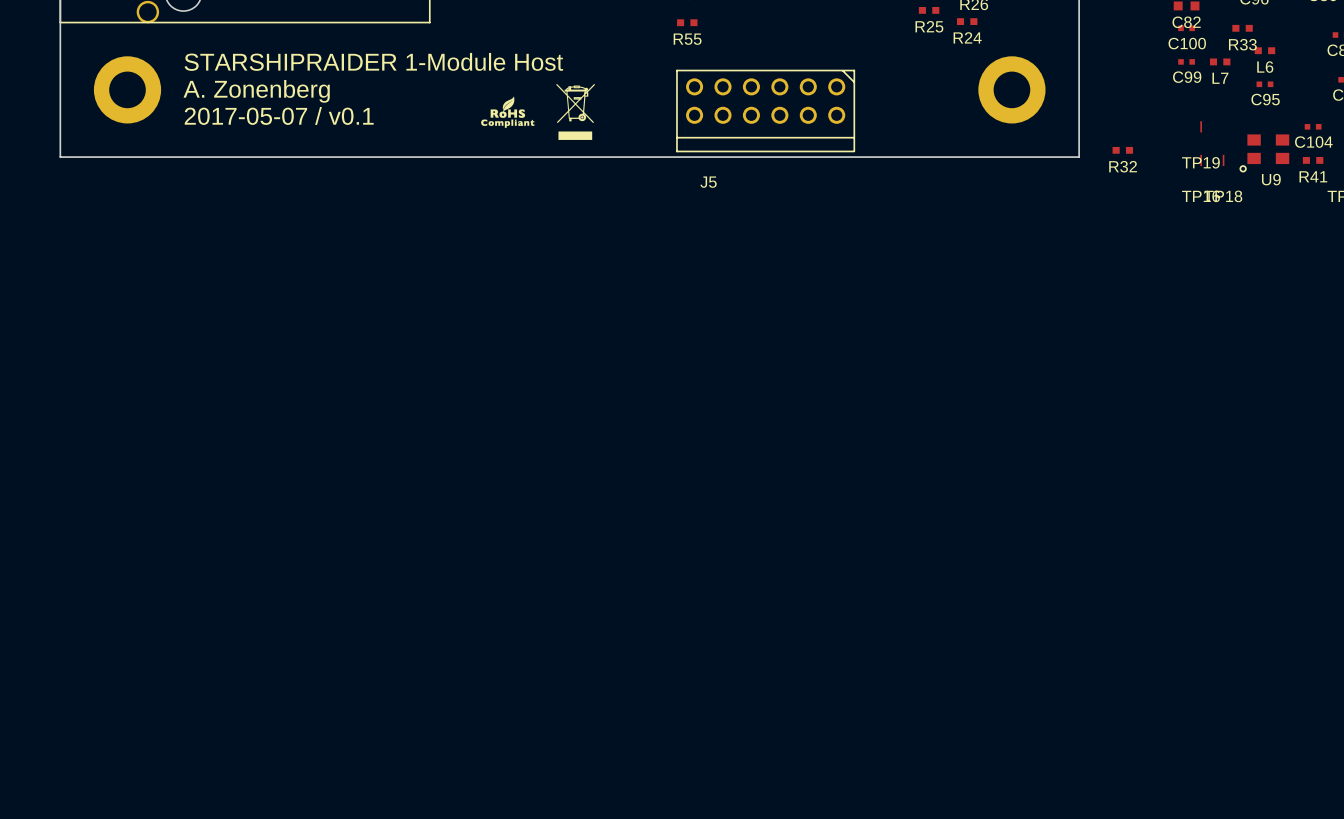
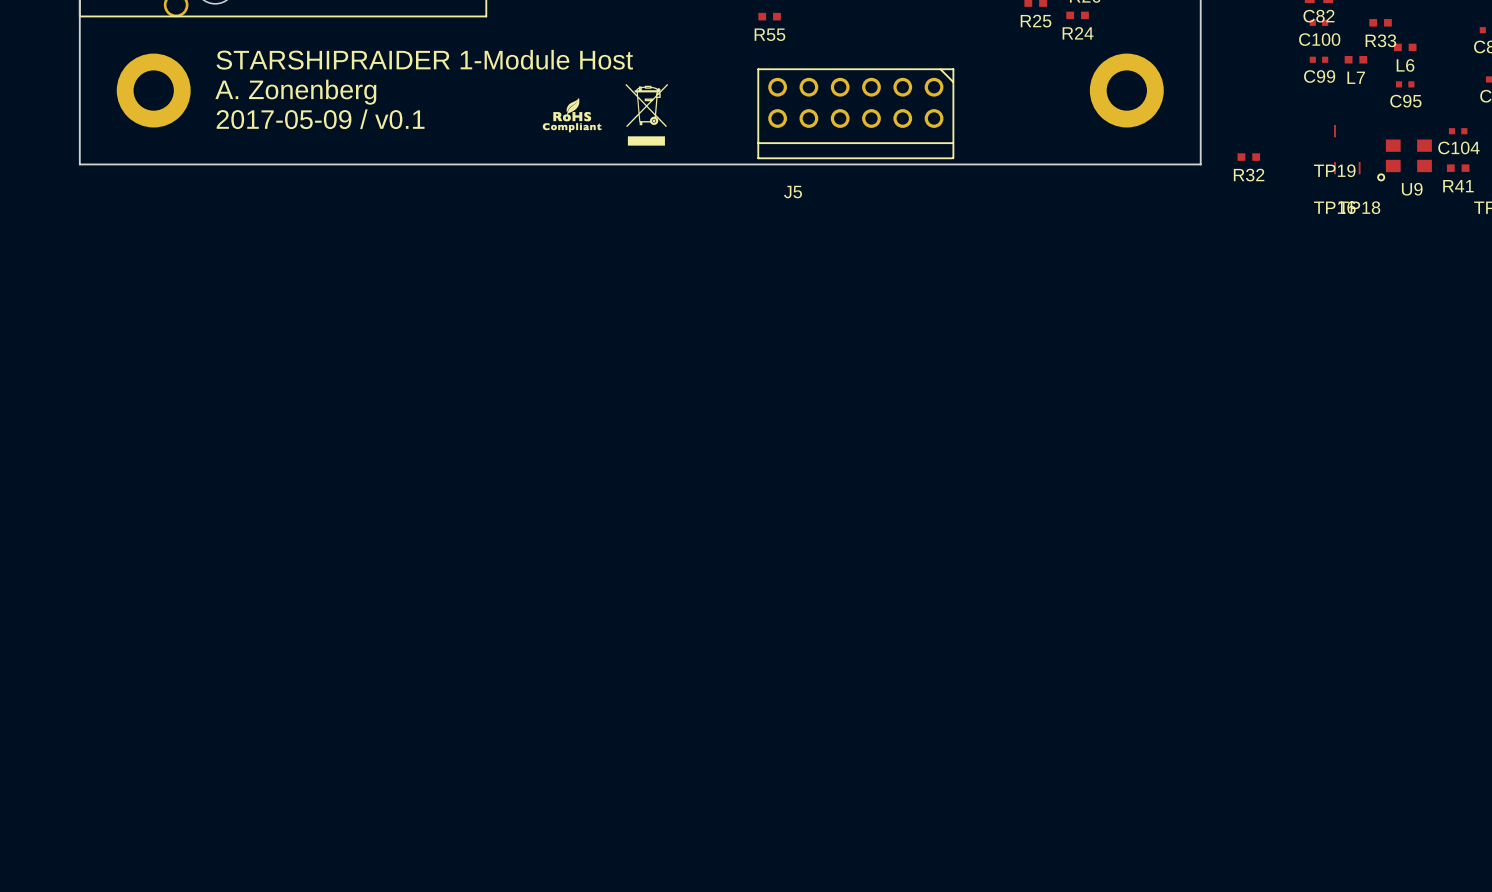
text: 2017-05-07 / v0.1 (279, 115) -> 2017-05-09 / v0.1 (320, 119)

